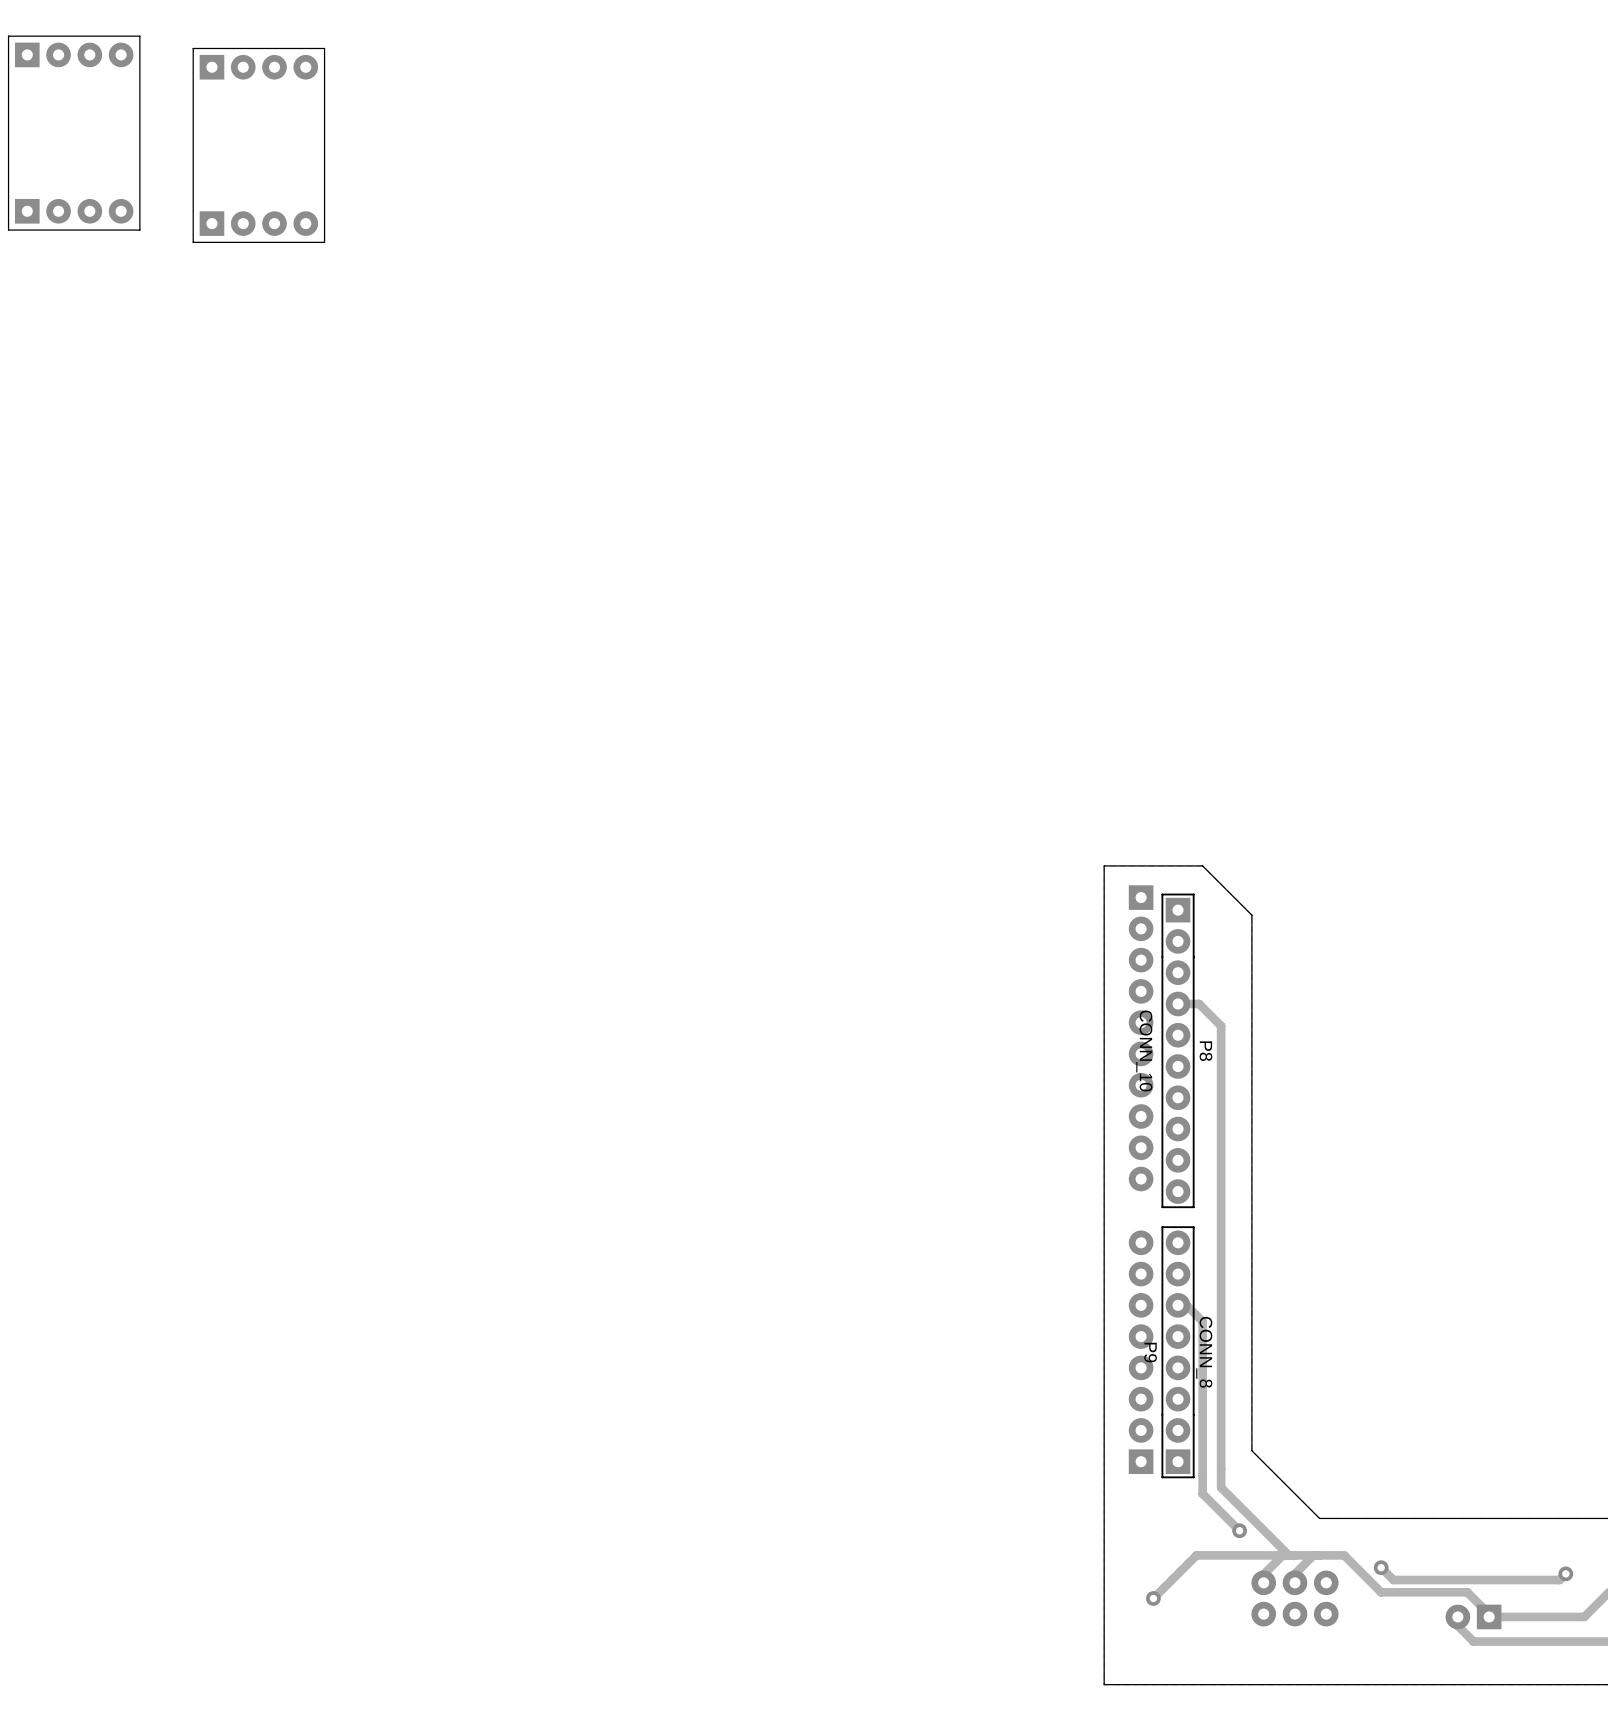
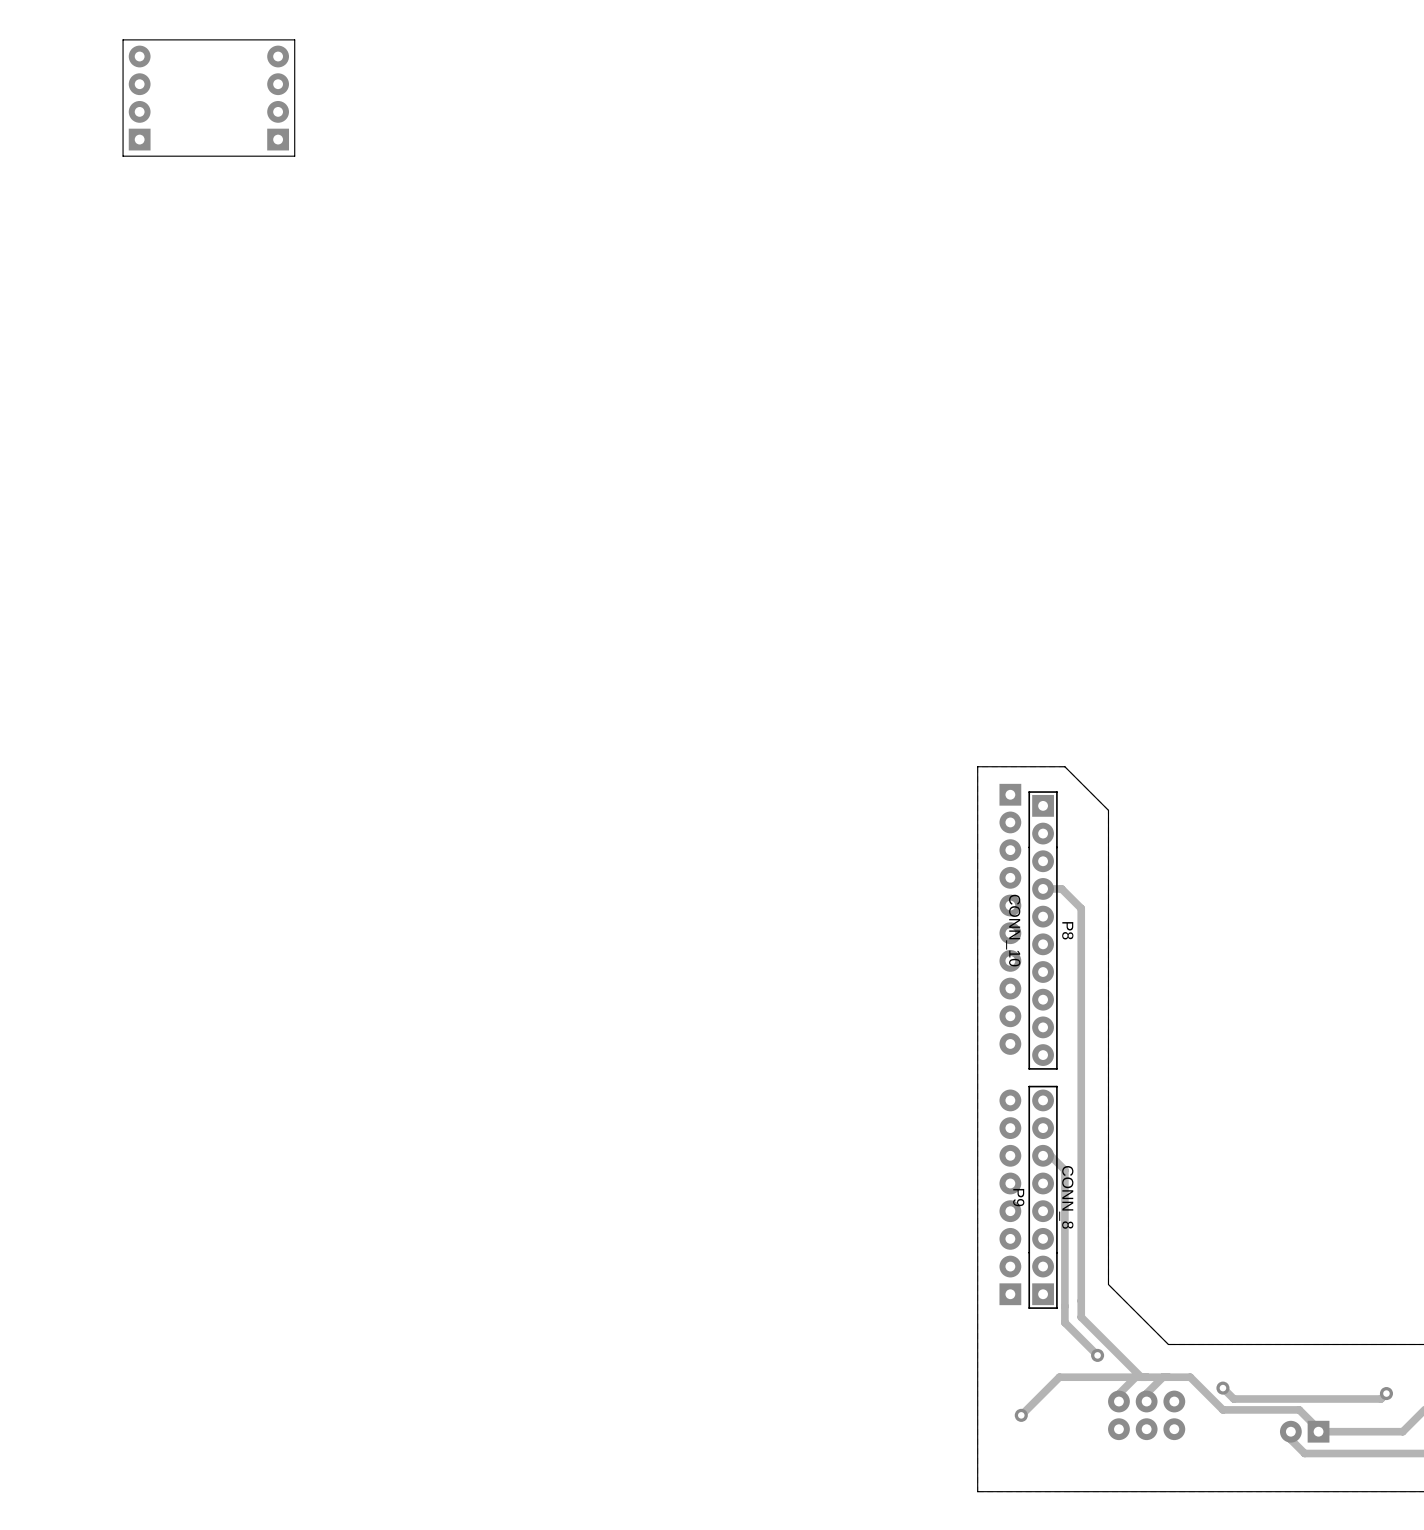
board edge: (139, 36) (139, 230) (8, 230) (8, 36) (139, 36) -> none
board edge: none -> (294, 39) (294, 156) (123, 156) (123, 39) (294, 39)
board edge: (324, 48) (193, 48) (193, 242) (324, 242) (324, 48) -> none
part: (74, 54) -> none
part: (258, 67) -> none
part: none -> (139, 98)
part: none -> (278, 98)
part: (74, 211) -> none
part: (258, 223) -> none

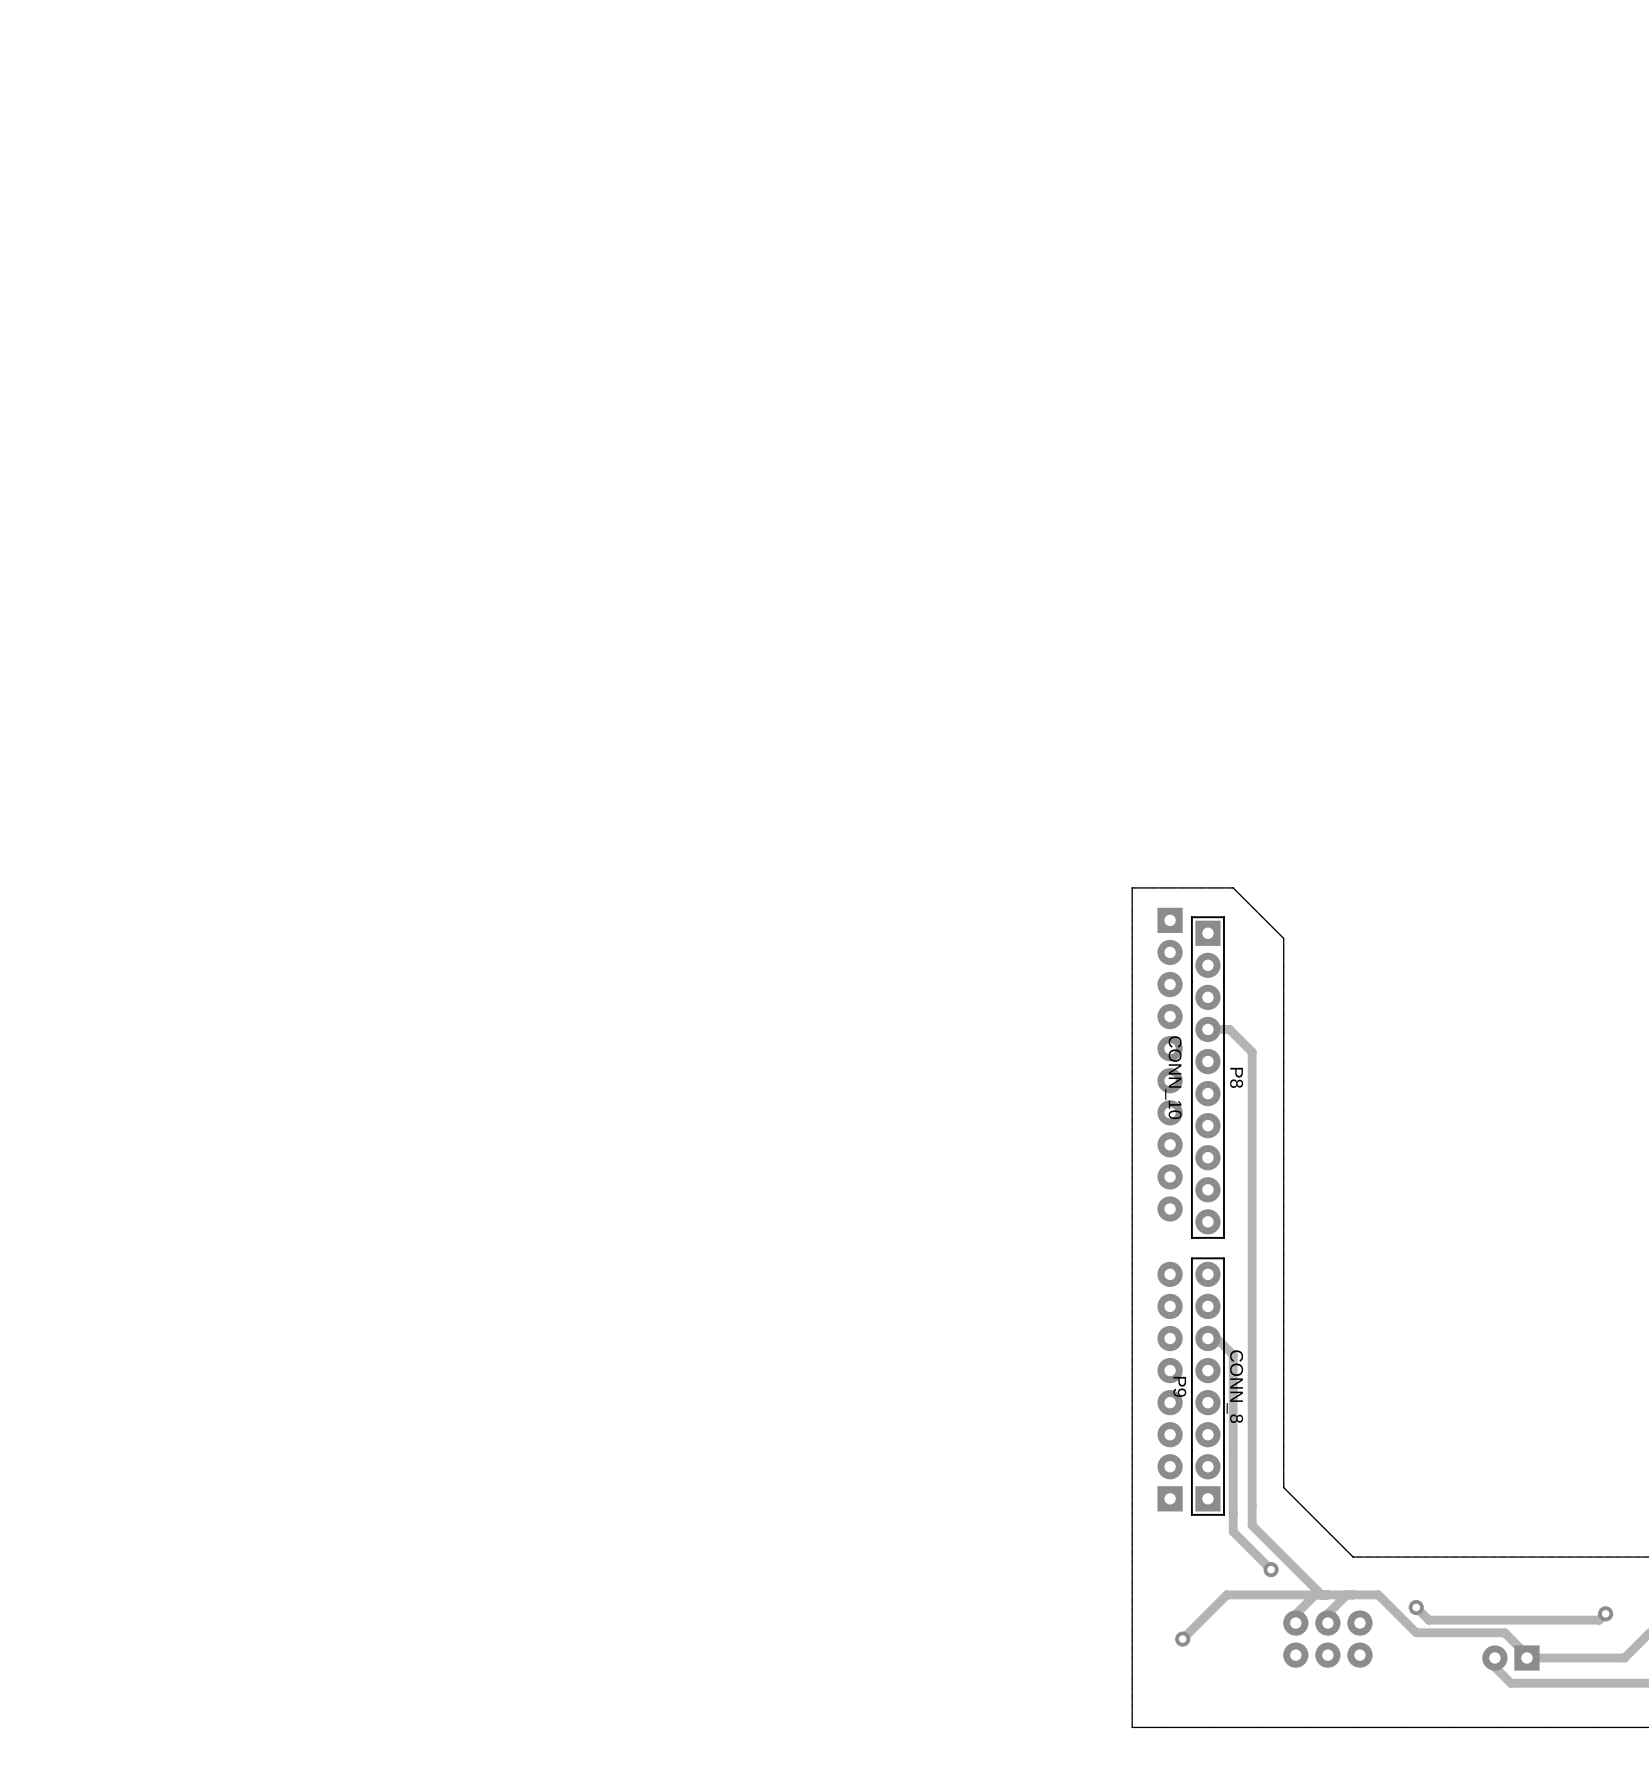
board edge: (294, 39) (294, 156) (123, 156) (123, 39) (294, 39) -> none
part: (139, 98) -> none
part: (278, 98) -> none

